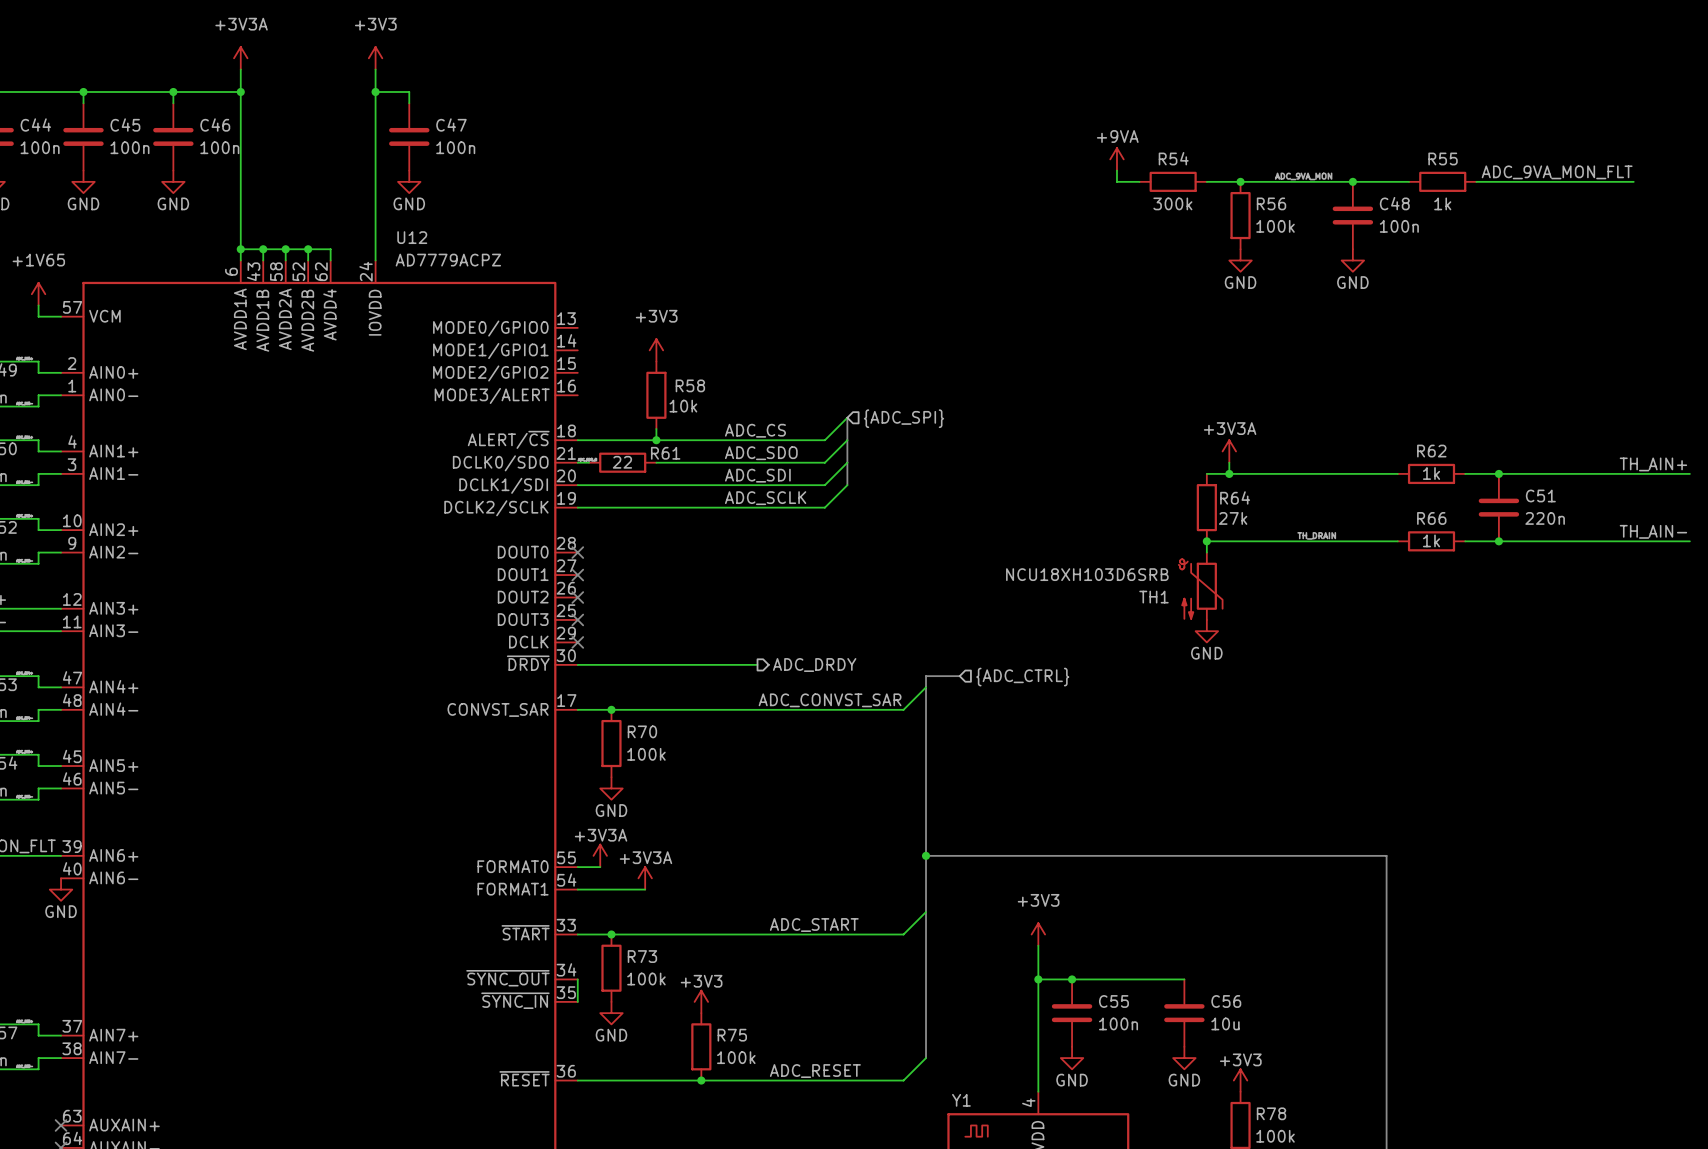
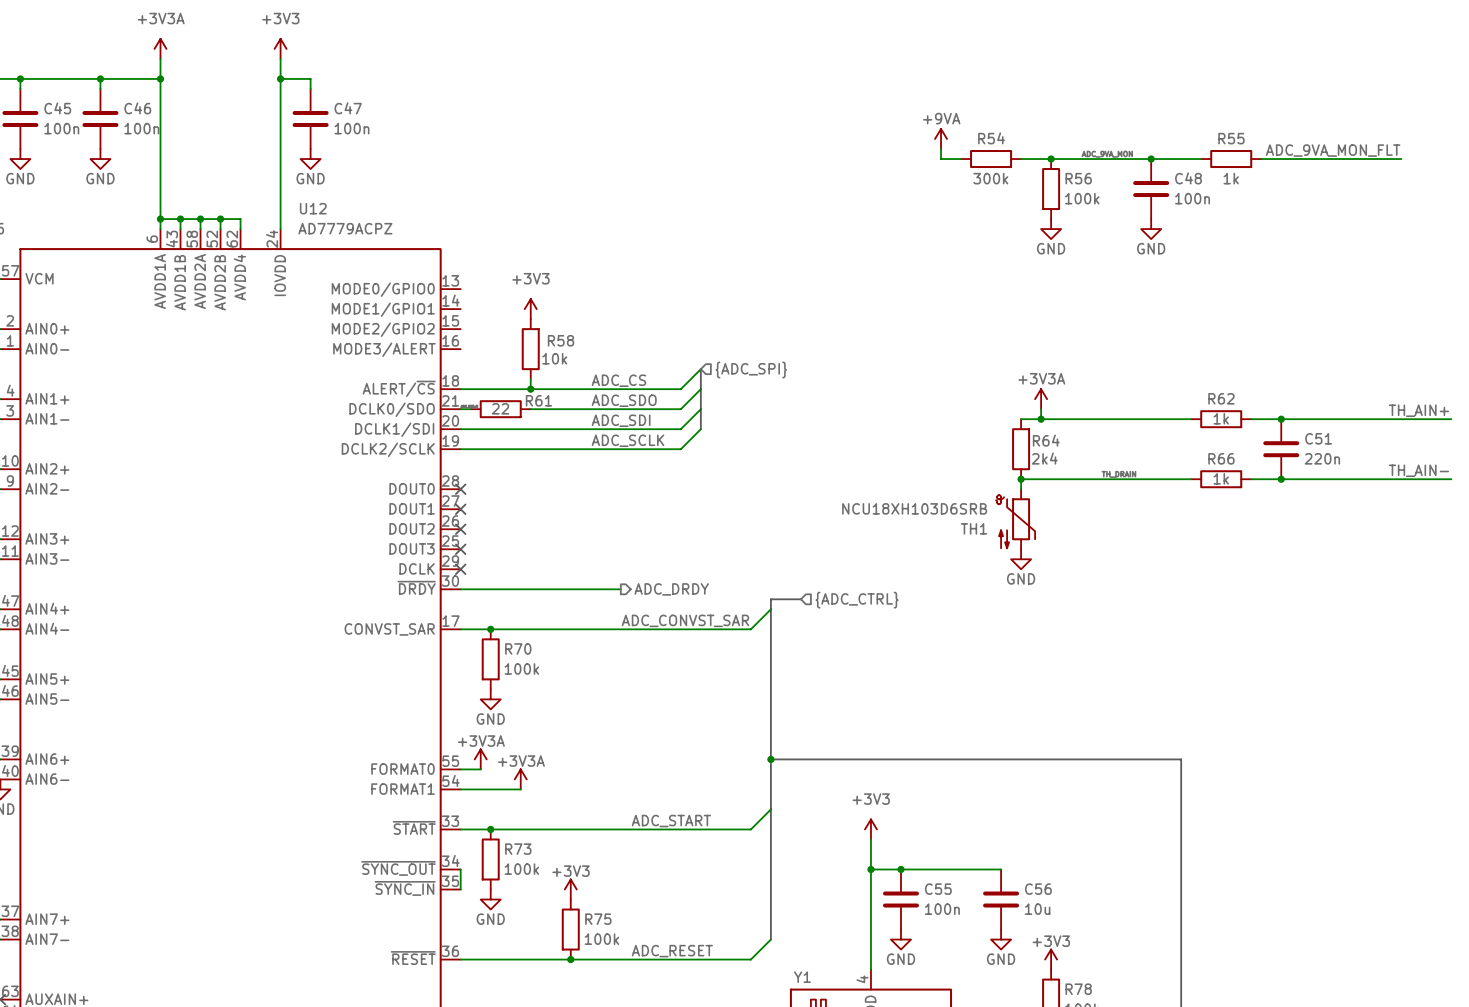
R64 value: 27k (1233, 518) -> 2k4 (1044, 458)

